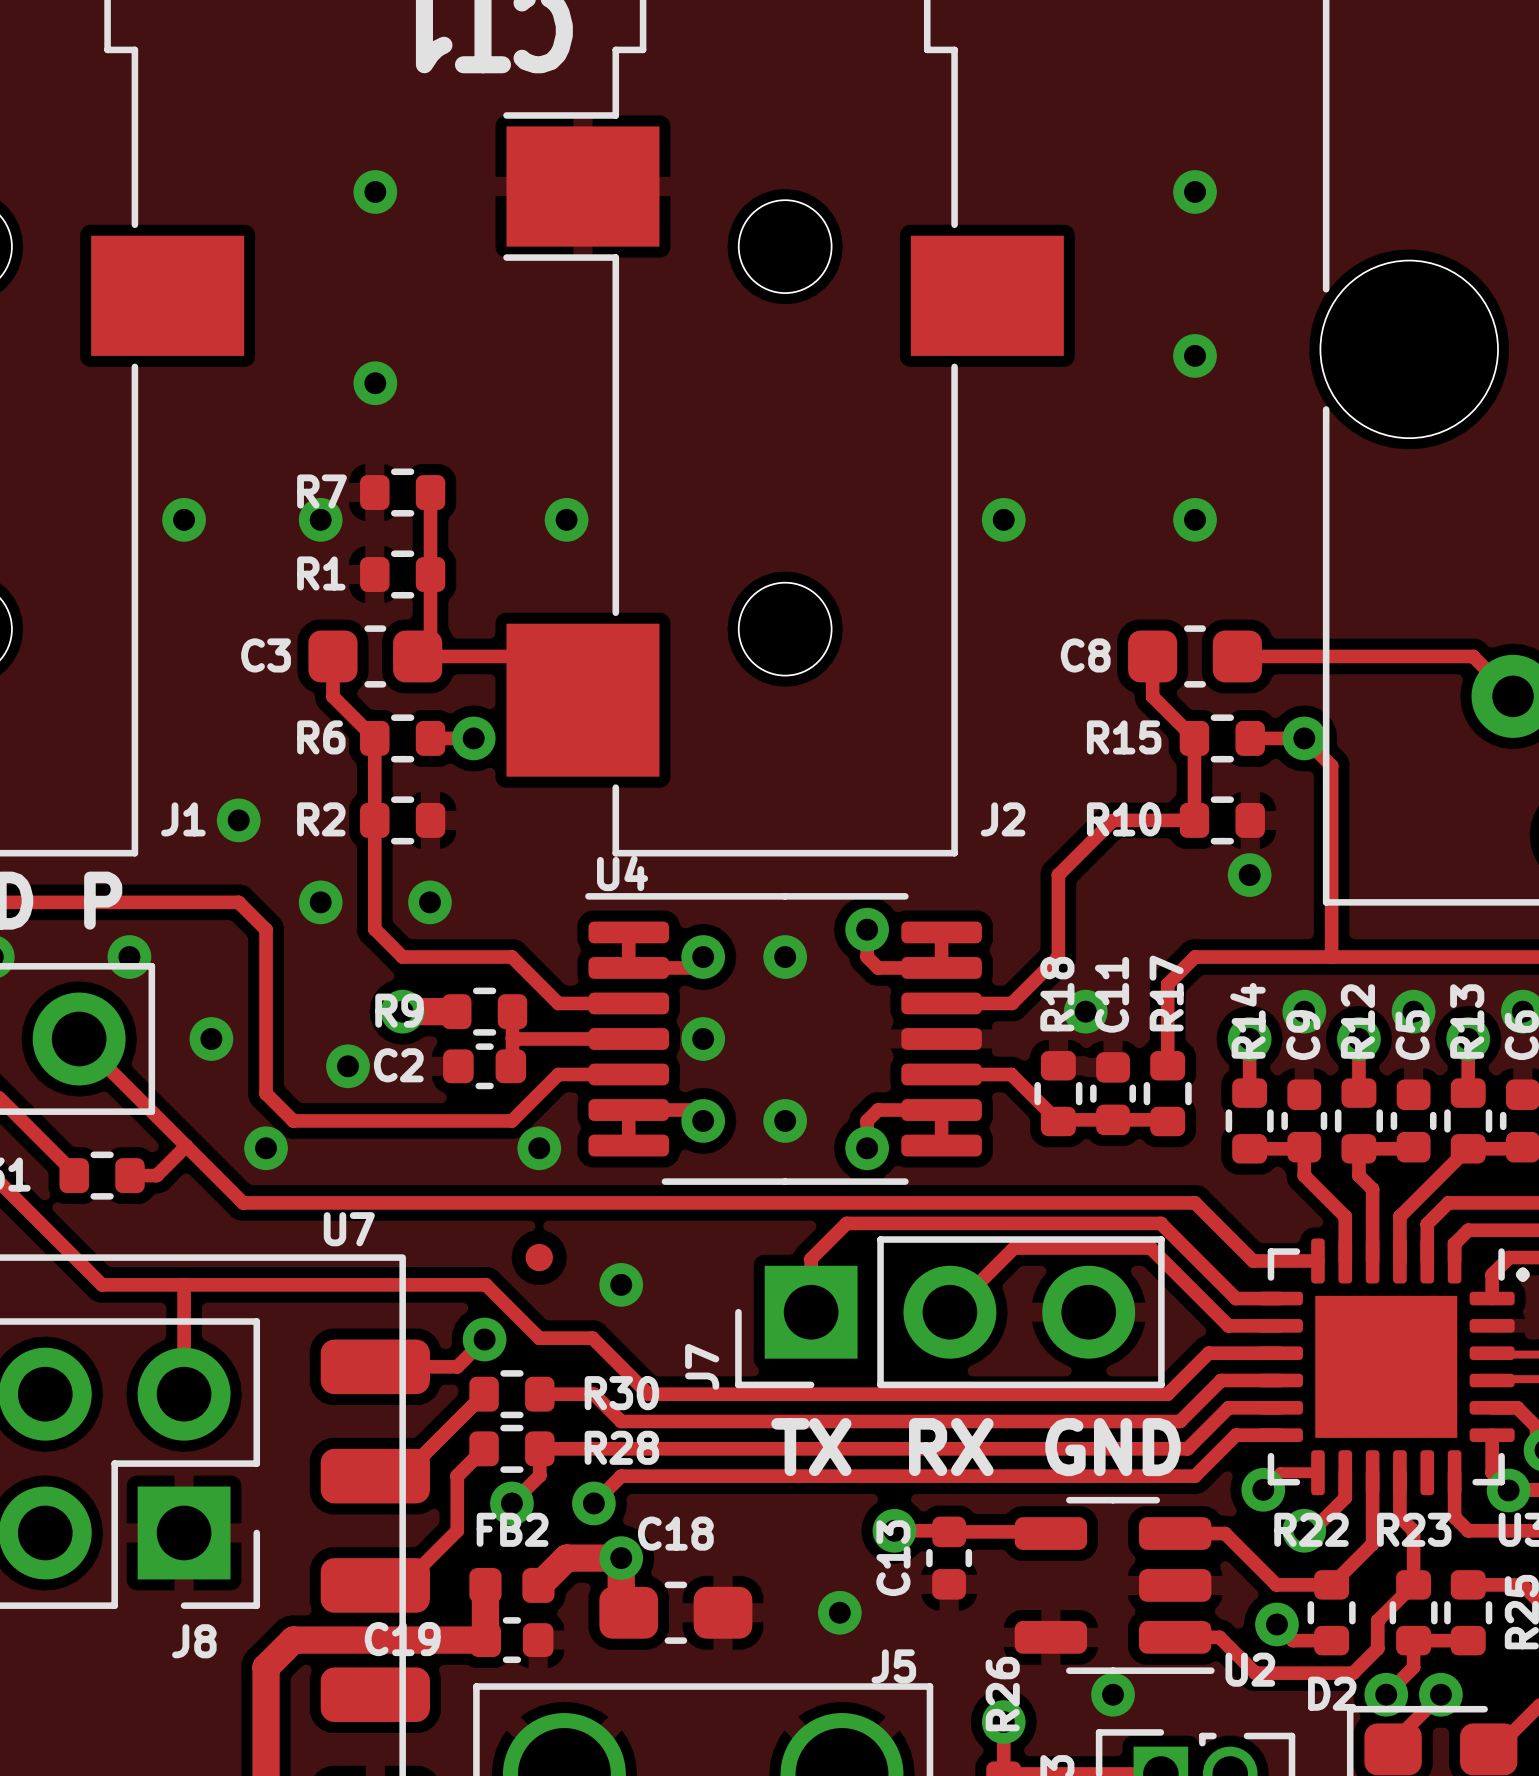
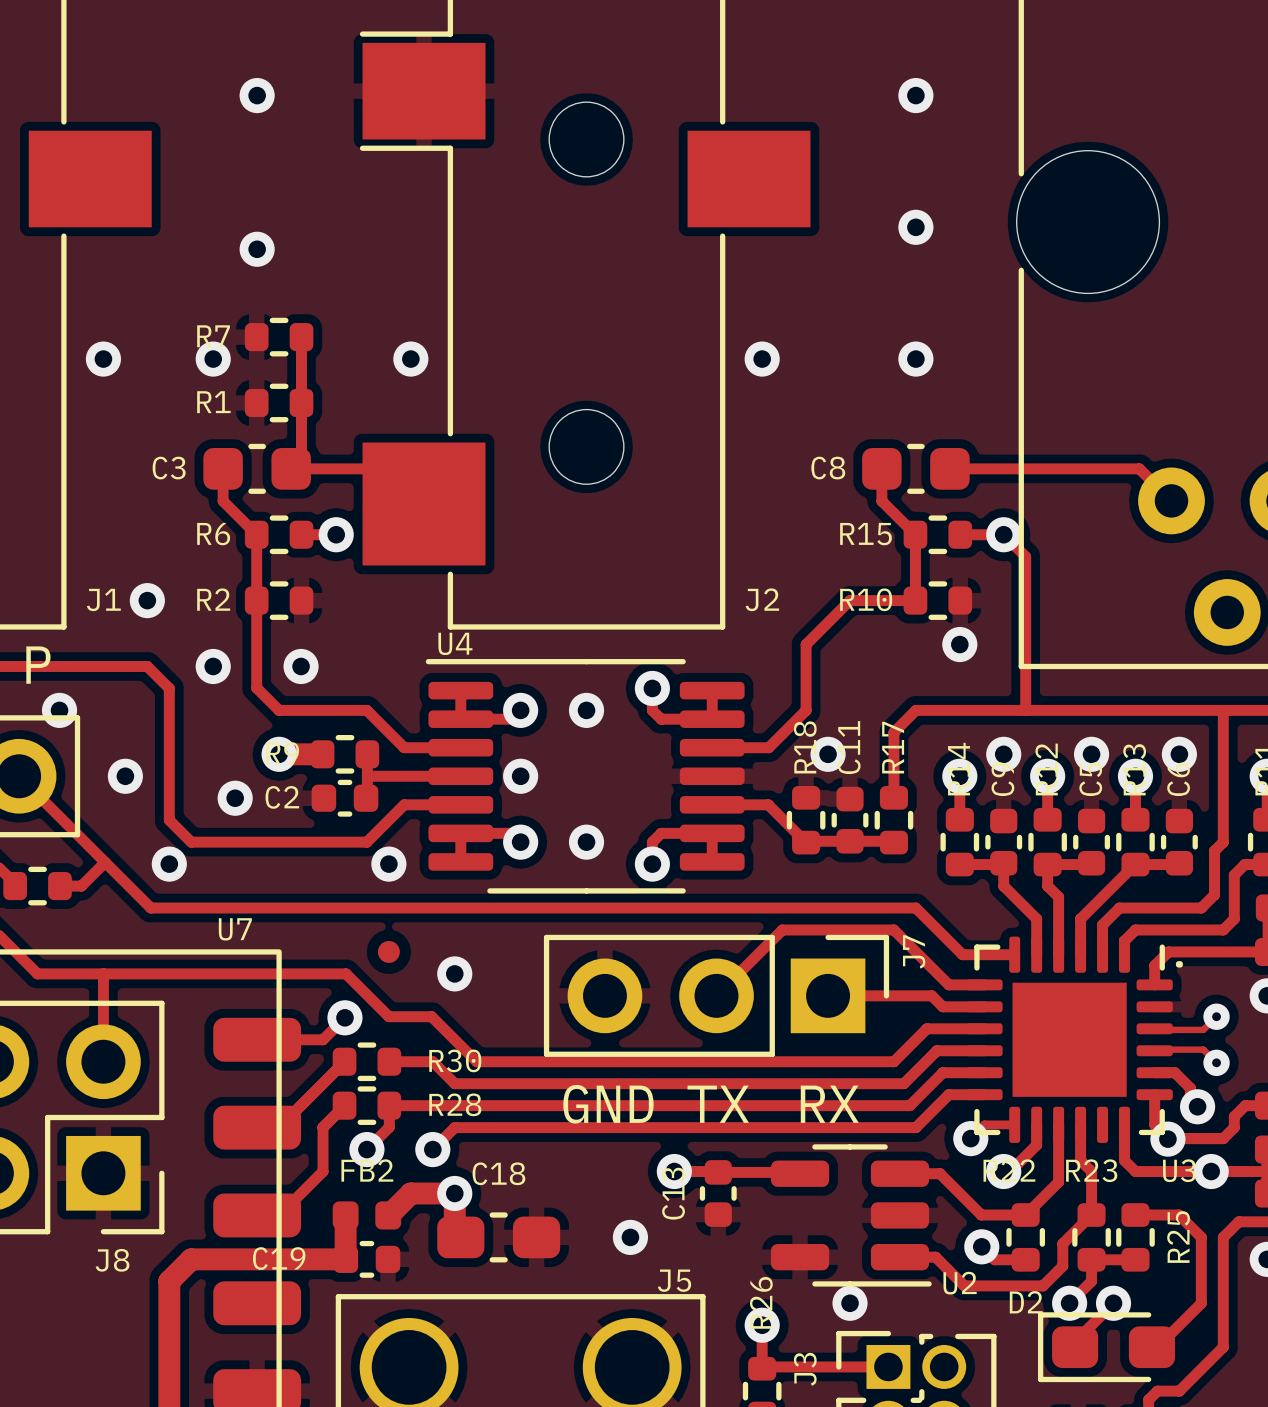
track: (1167, 1230) (1160, 1223) (846, 1223) (811, 1258) (811, 1312) -> (893, 929) (782, 929) (716, 995)
track: (949, 1312) (1014, 1248) (1150, 1248) (1214, 1312) -> (828, 995) (931, 995)
J7 rotation: 0° (949, 1312) -> 180° (716, 995)
text: TX (811, 1447) -> GND (608, 1104)
text: RX (951, 1447) -> TX (718, 1104)
text: GND (1113, 1447) -> RX (829, 1104)

